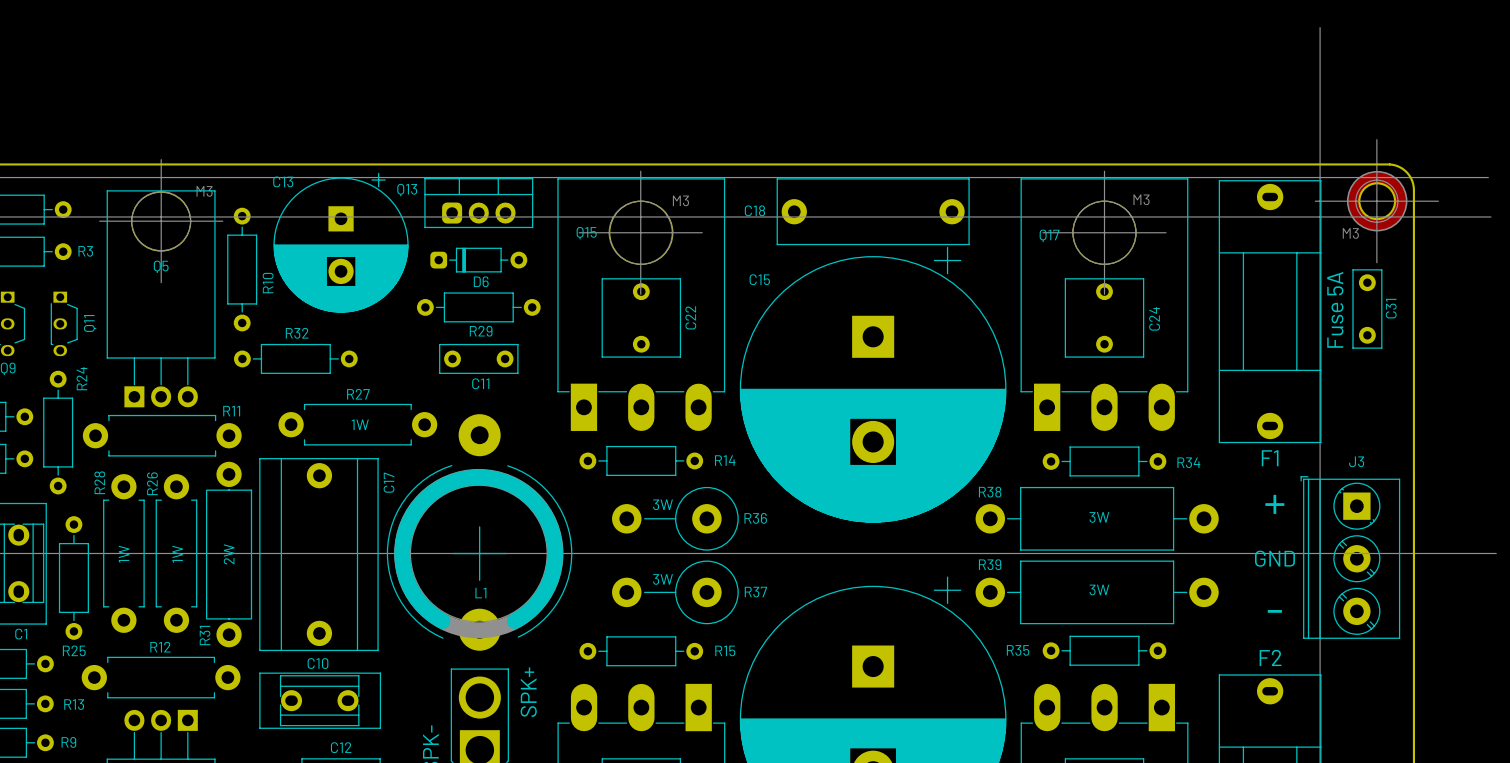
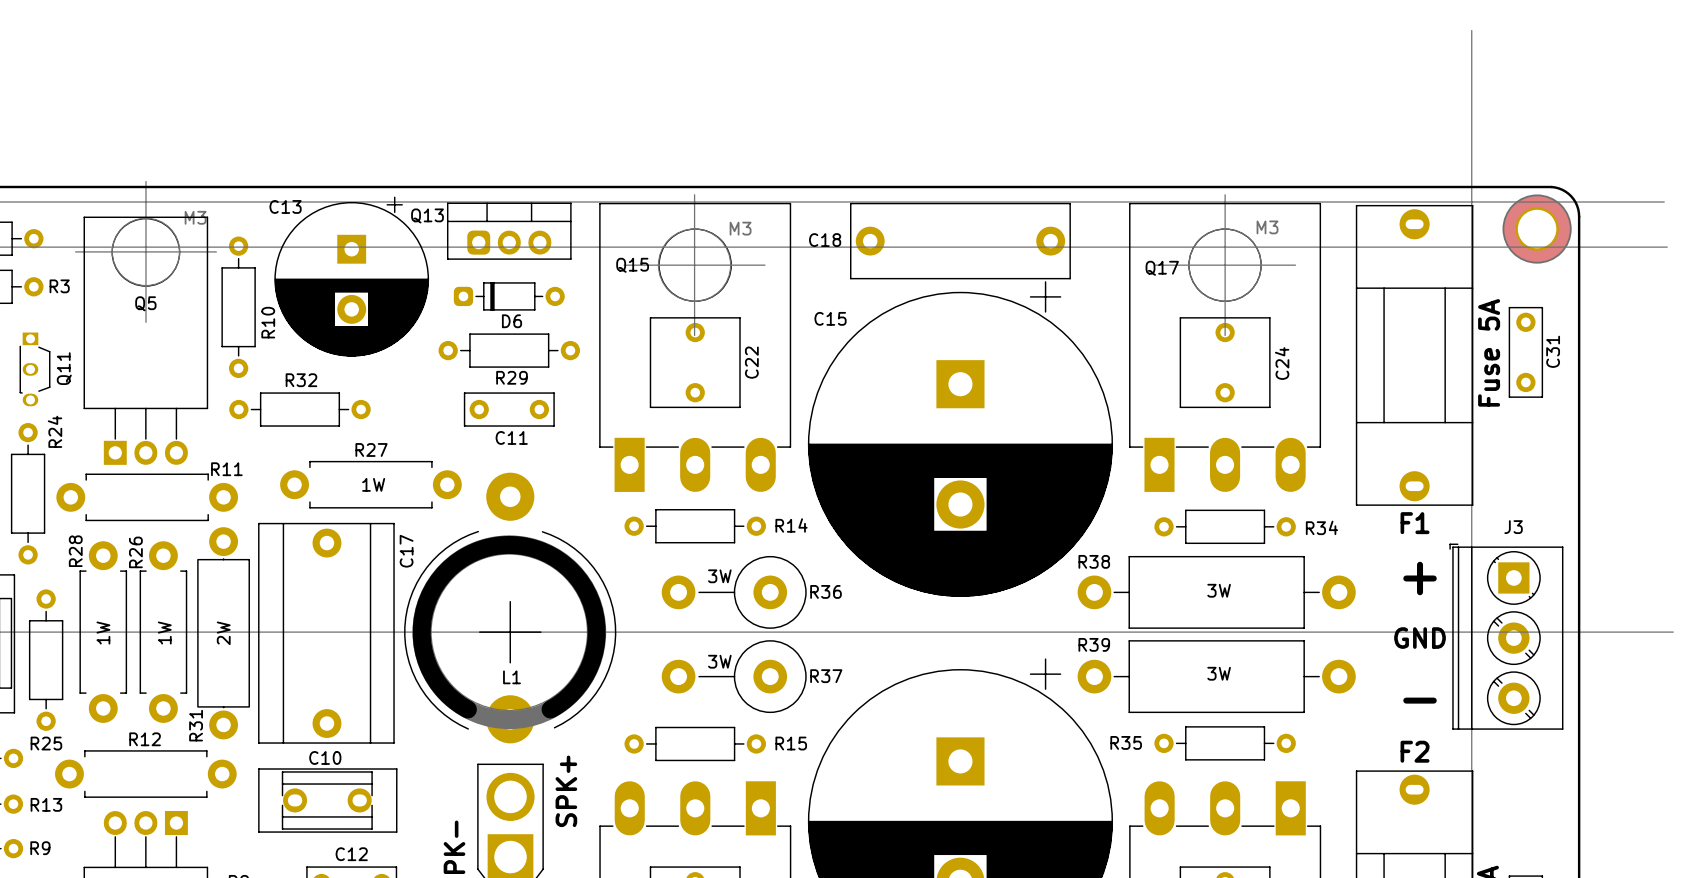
line: (1376, 139) (1376, 262) -> none
drawing: [1355, 179, 1399, 223] -> none
line: (1315, 201) (1438, 201) -> none
text: M3 (1350, 233) -> none

